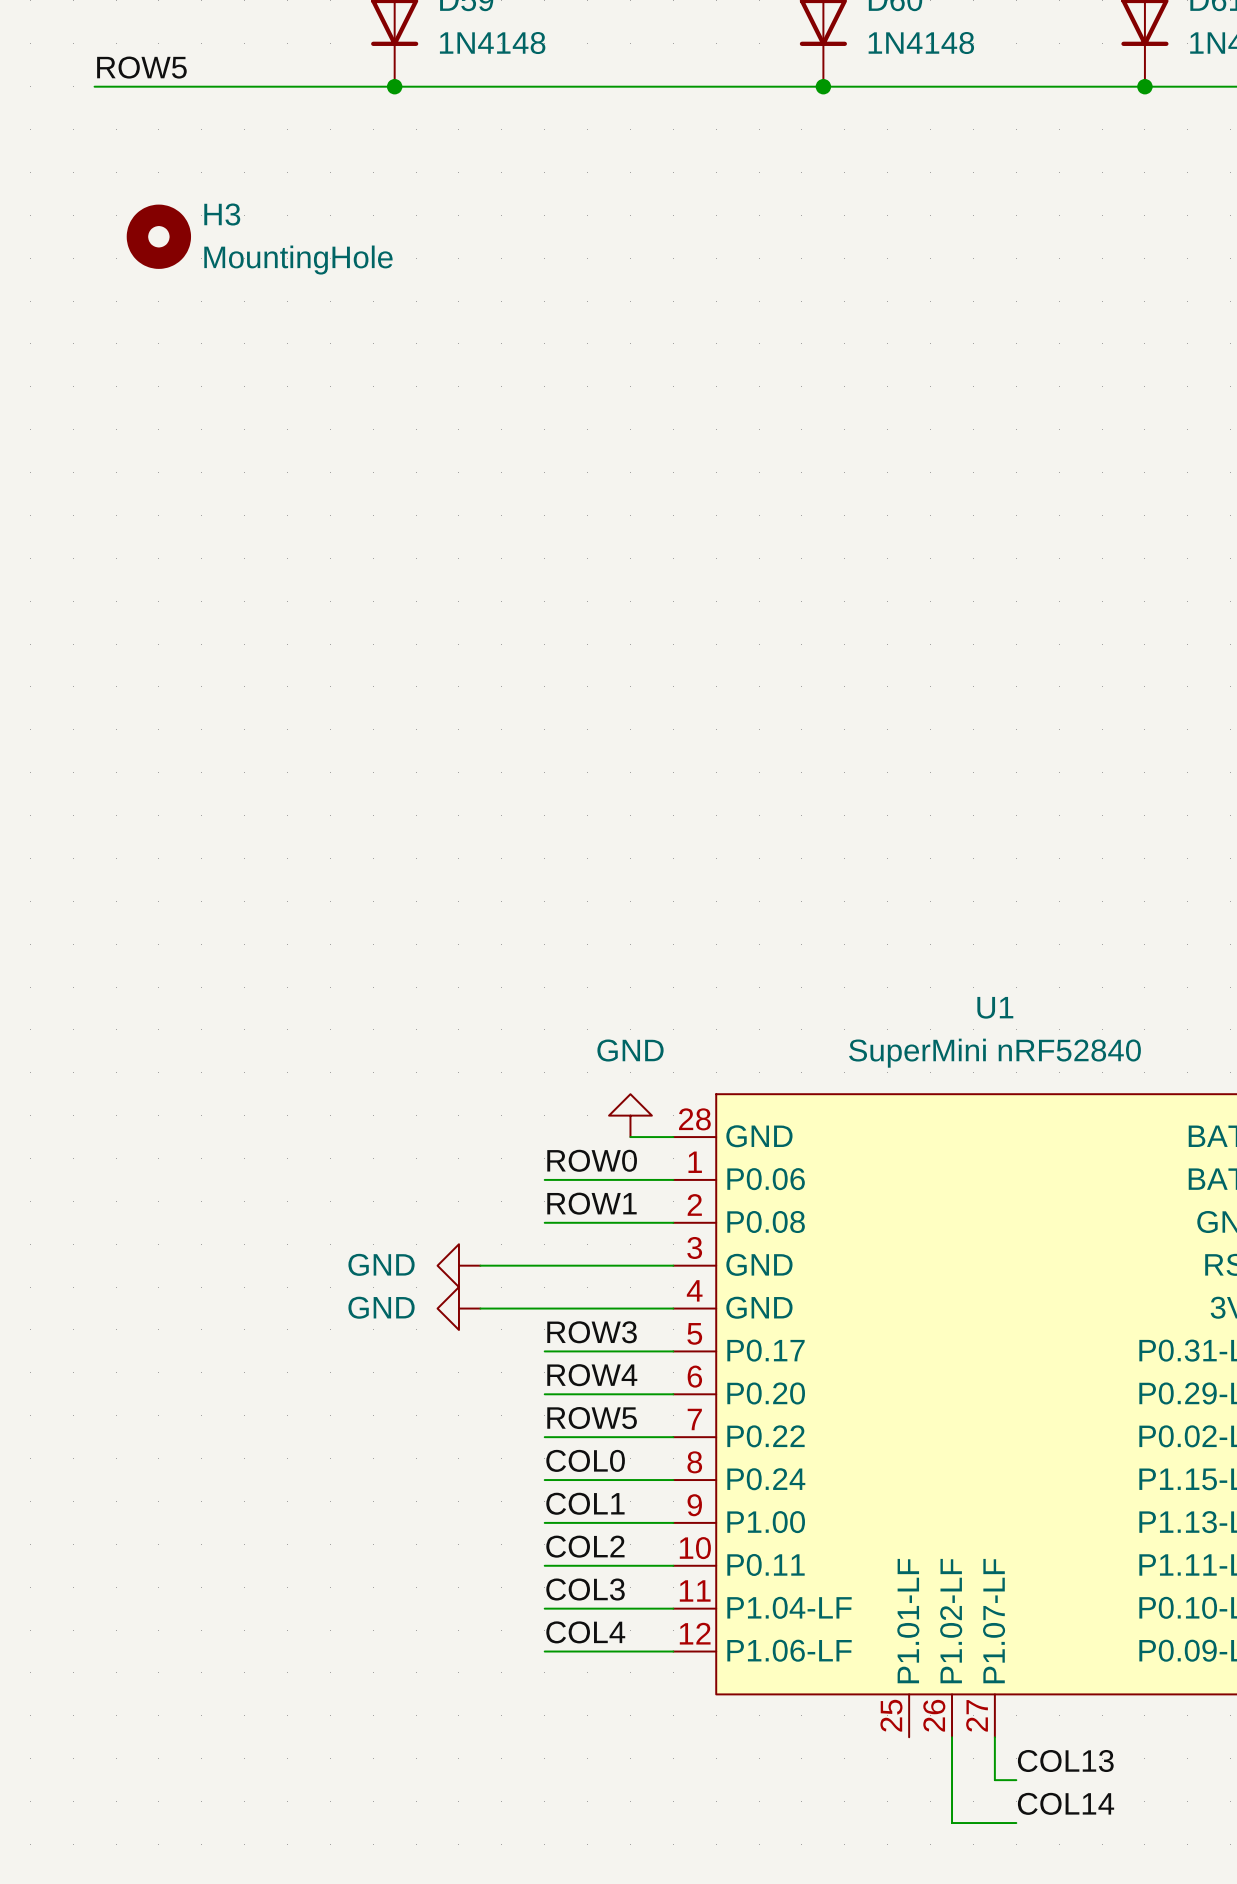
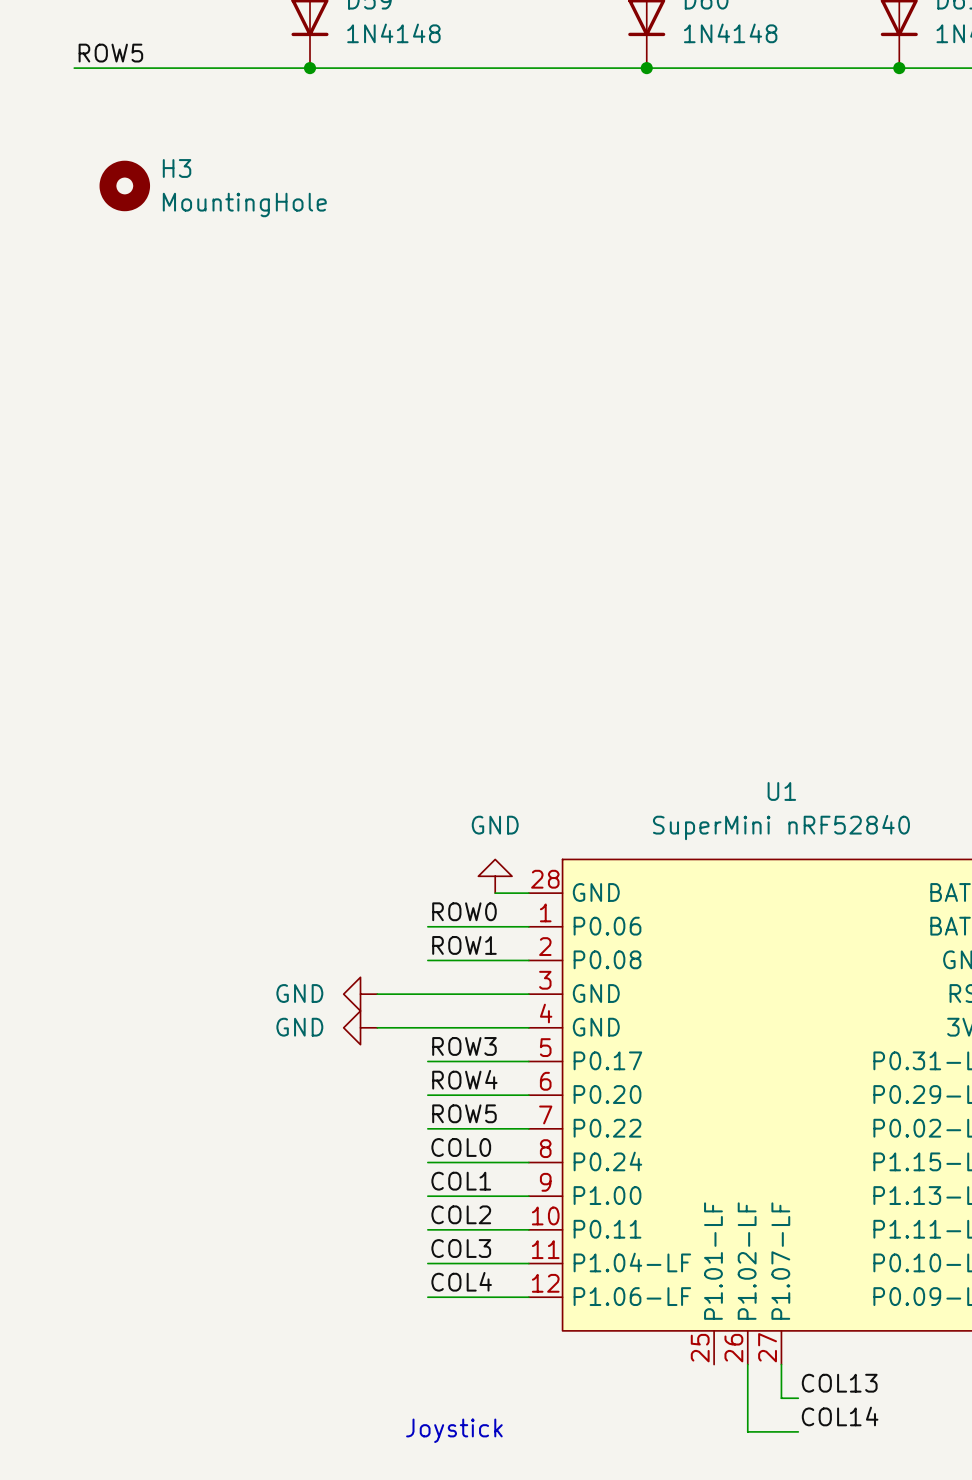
text: none -> Joystick (454, 1430)

